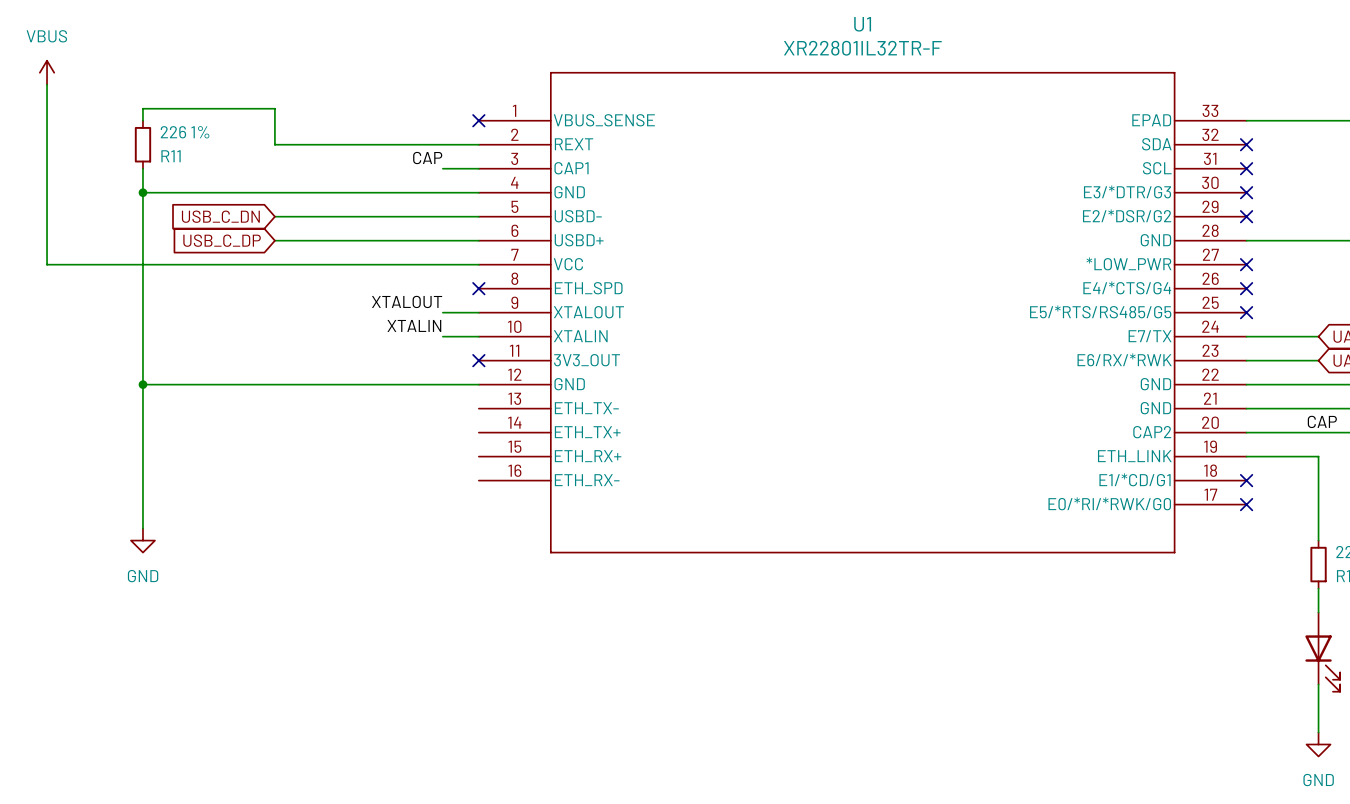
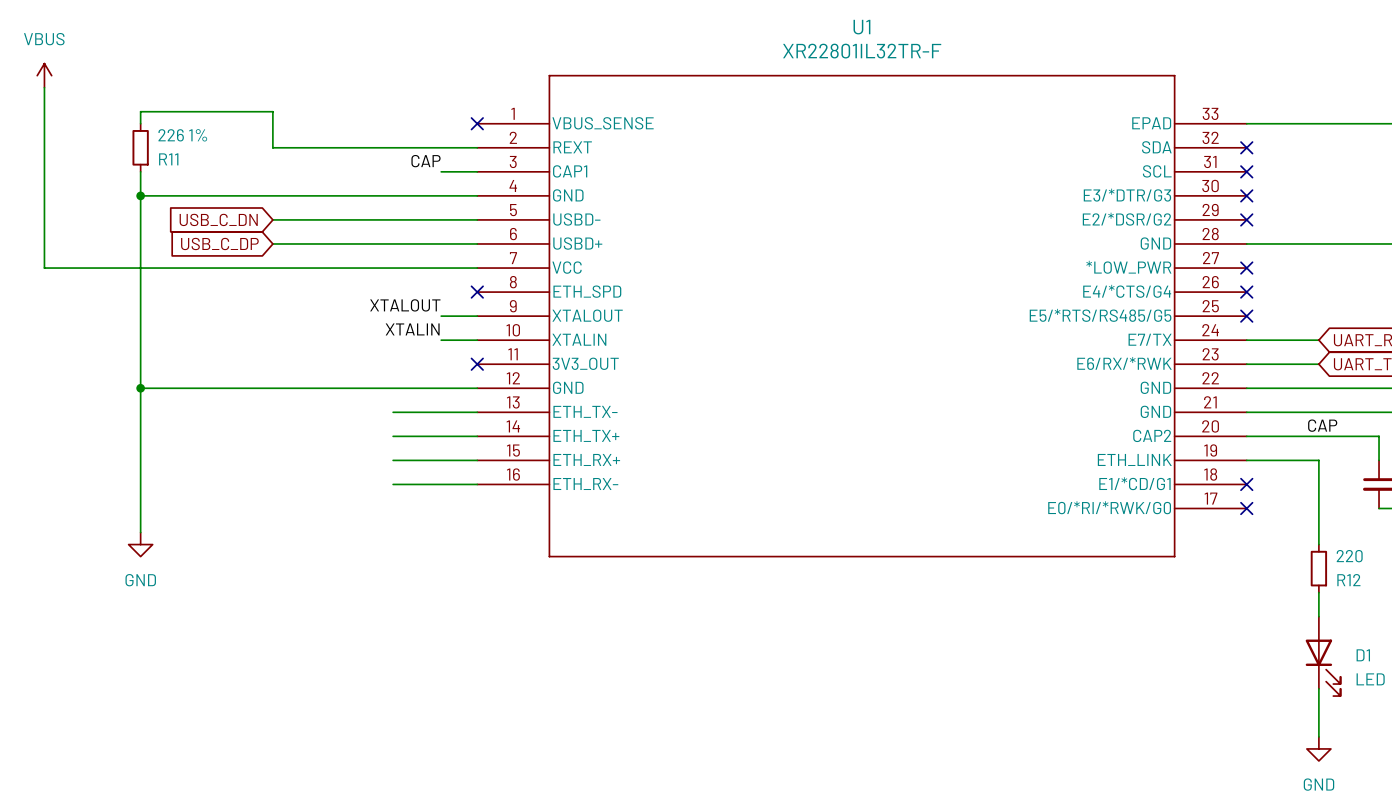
wire: none -> (393, 412) (477, 412)
wire: none -> (393, 436) (477, 436)
wire: none -> (393, 460) (477, 460)
wire: none -> (393, 484) (477, 484)

